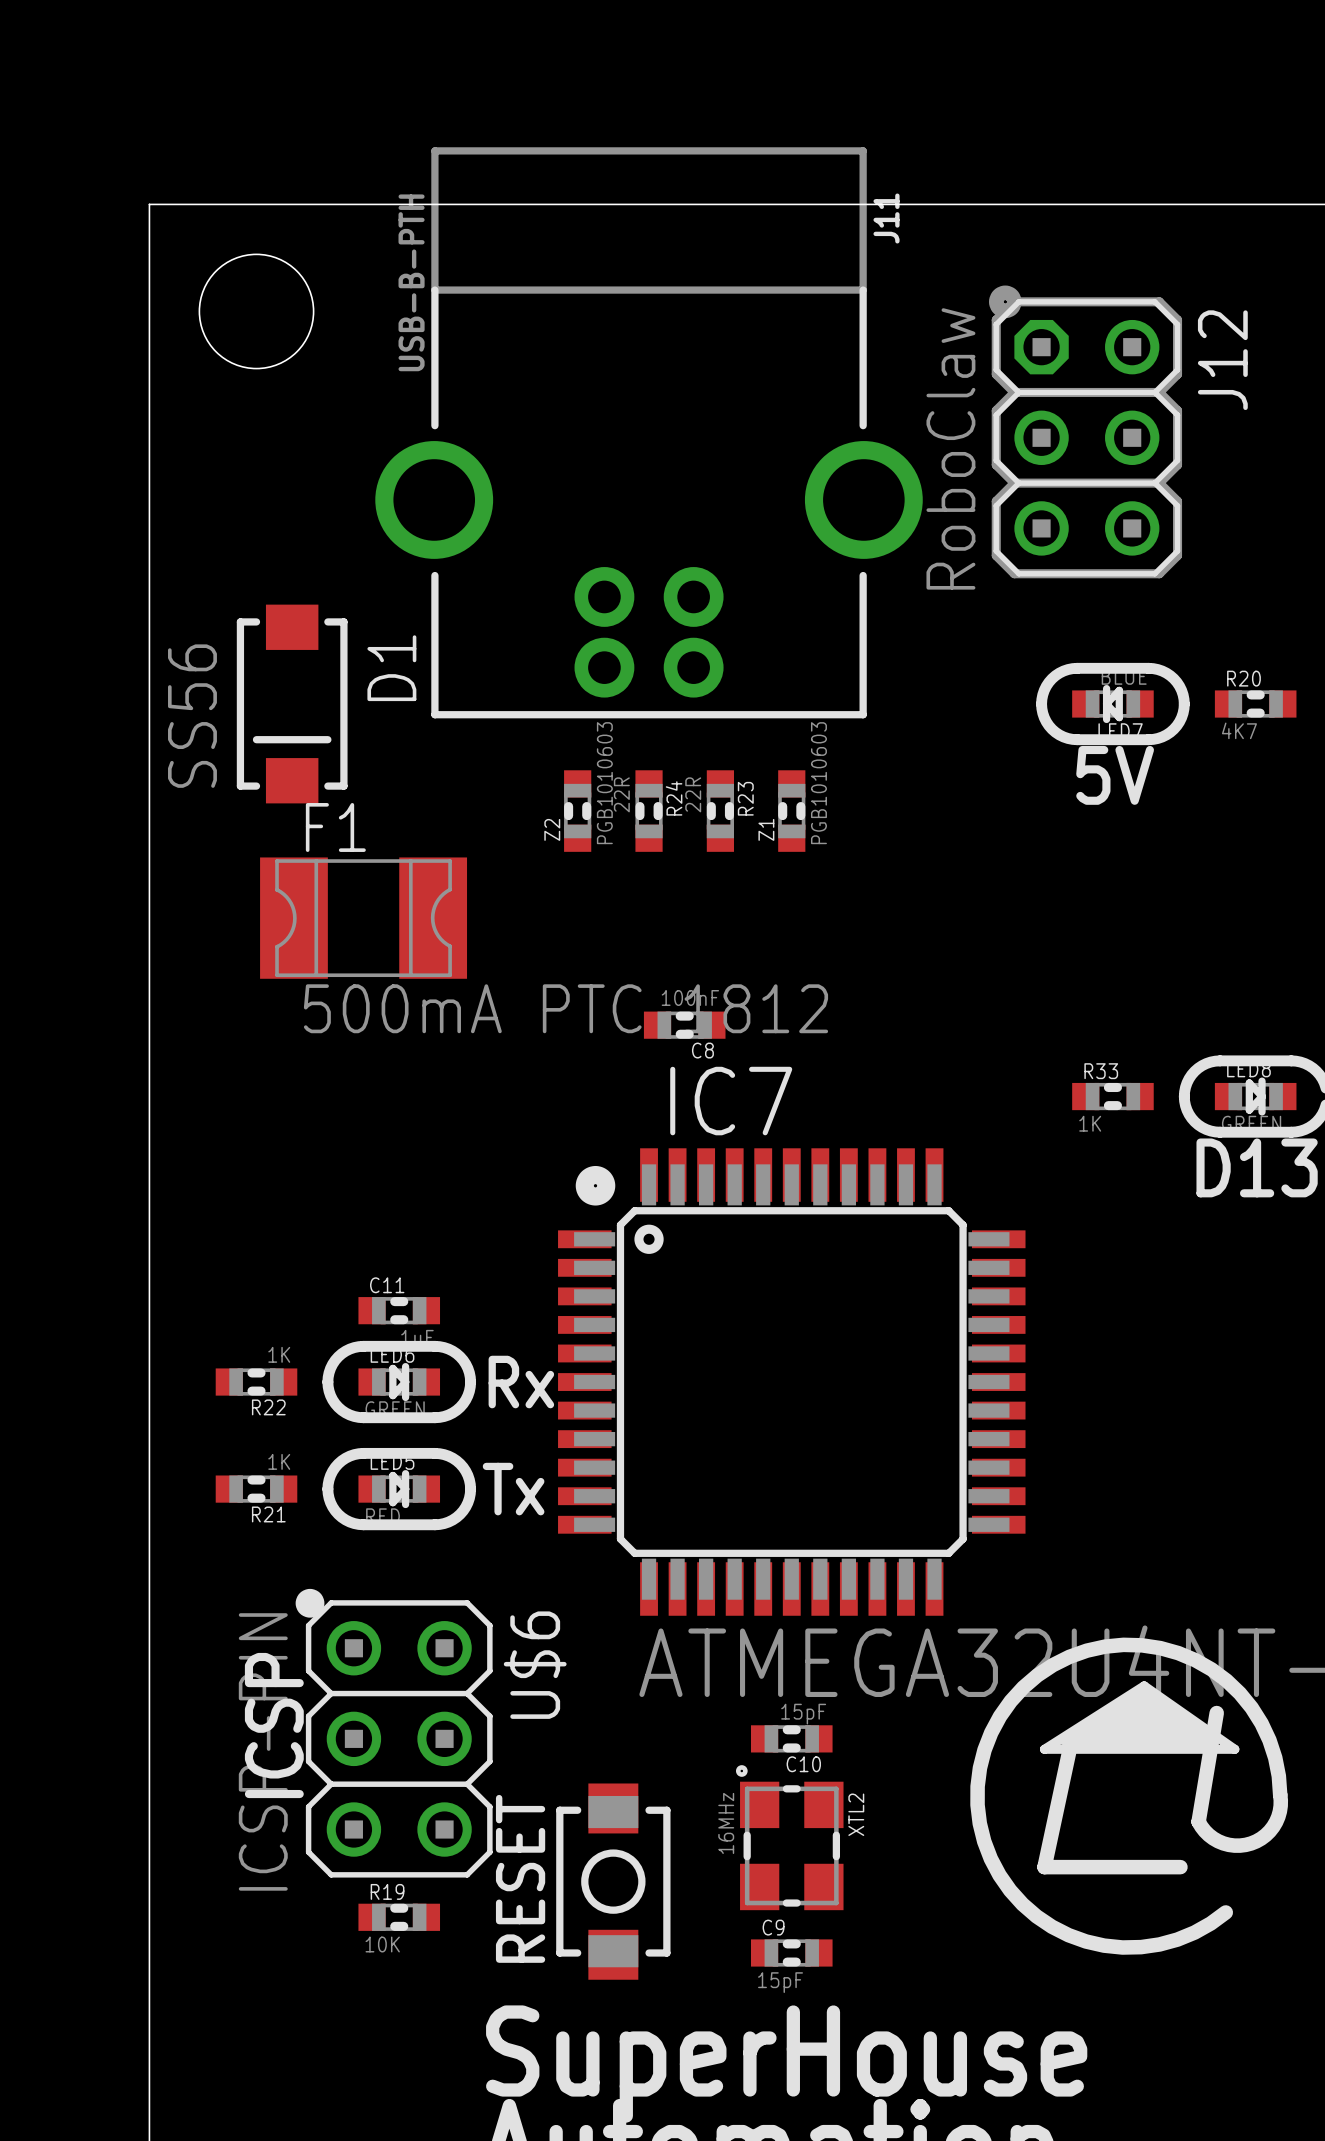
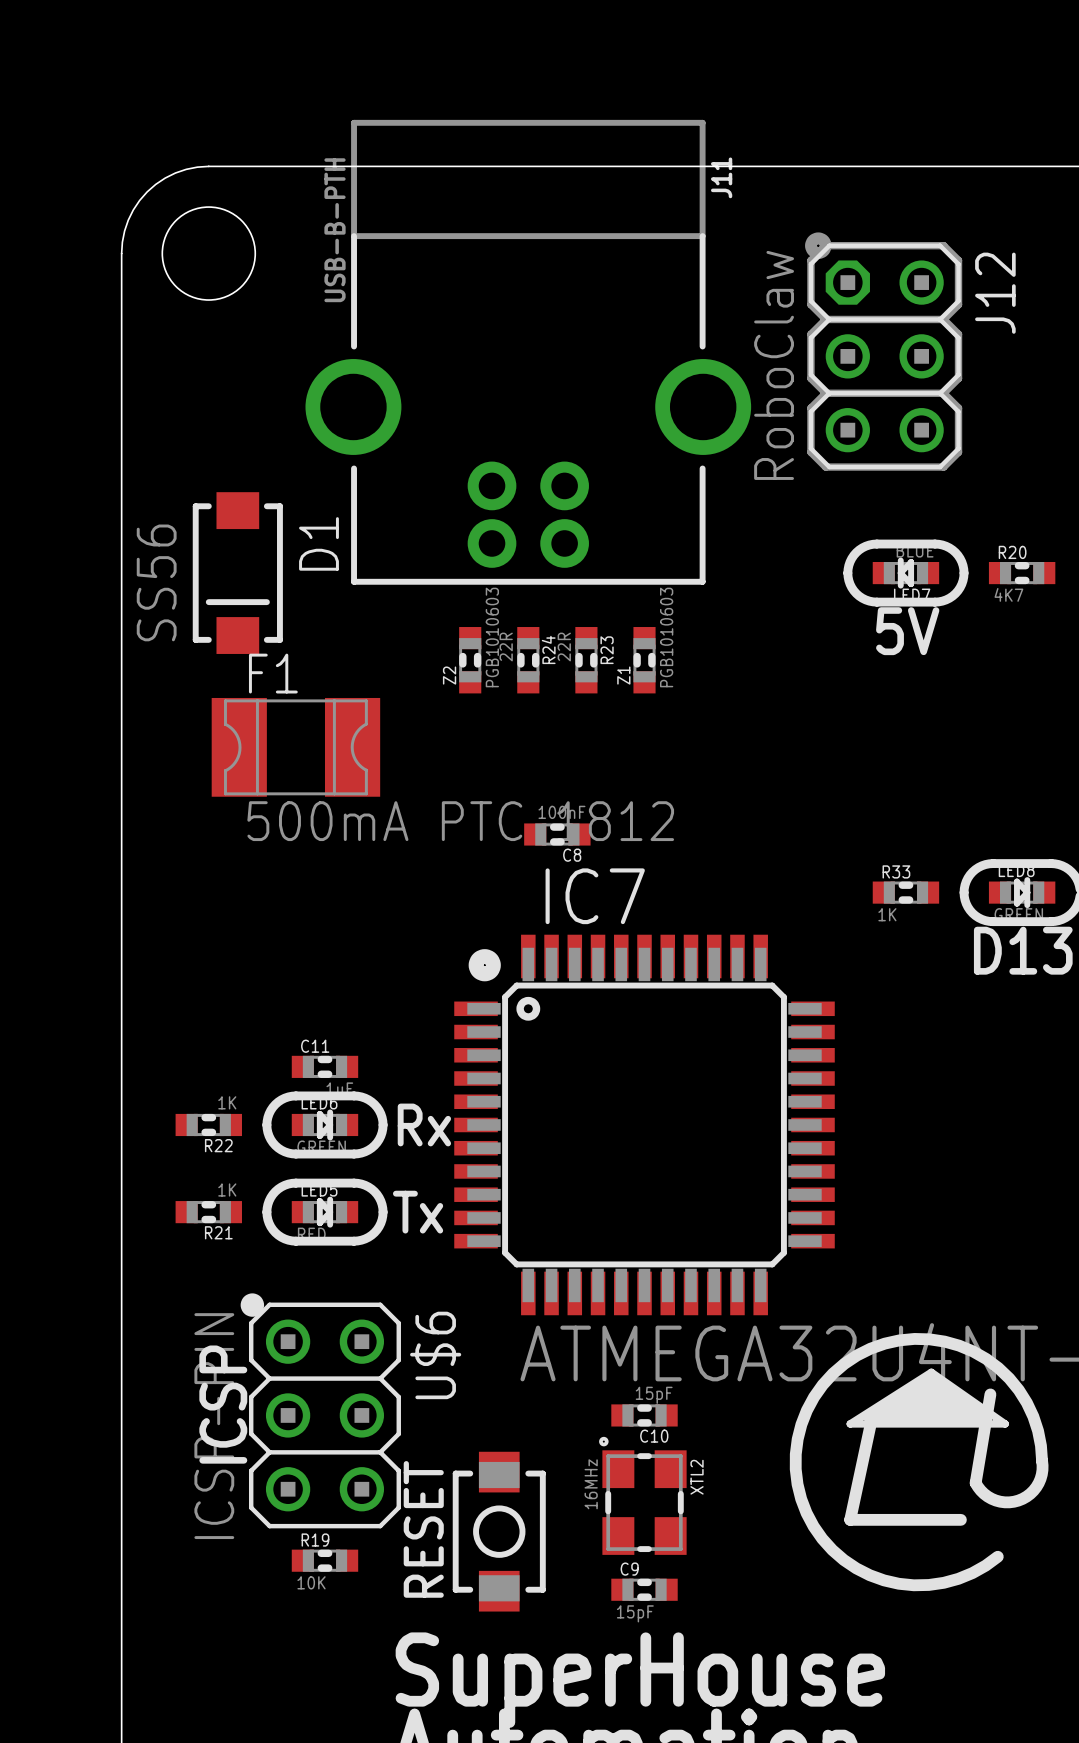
board edge: (256, 204) (149, 204) (149, 311) -> (208, 166) (175, 173) (147, 191) (128, 220) (121, 253)

